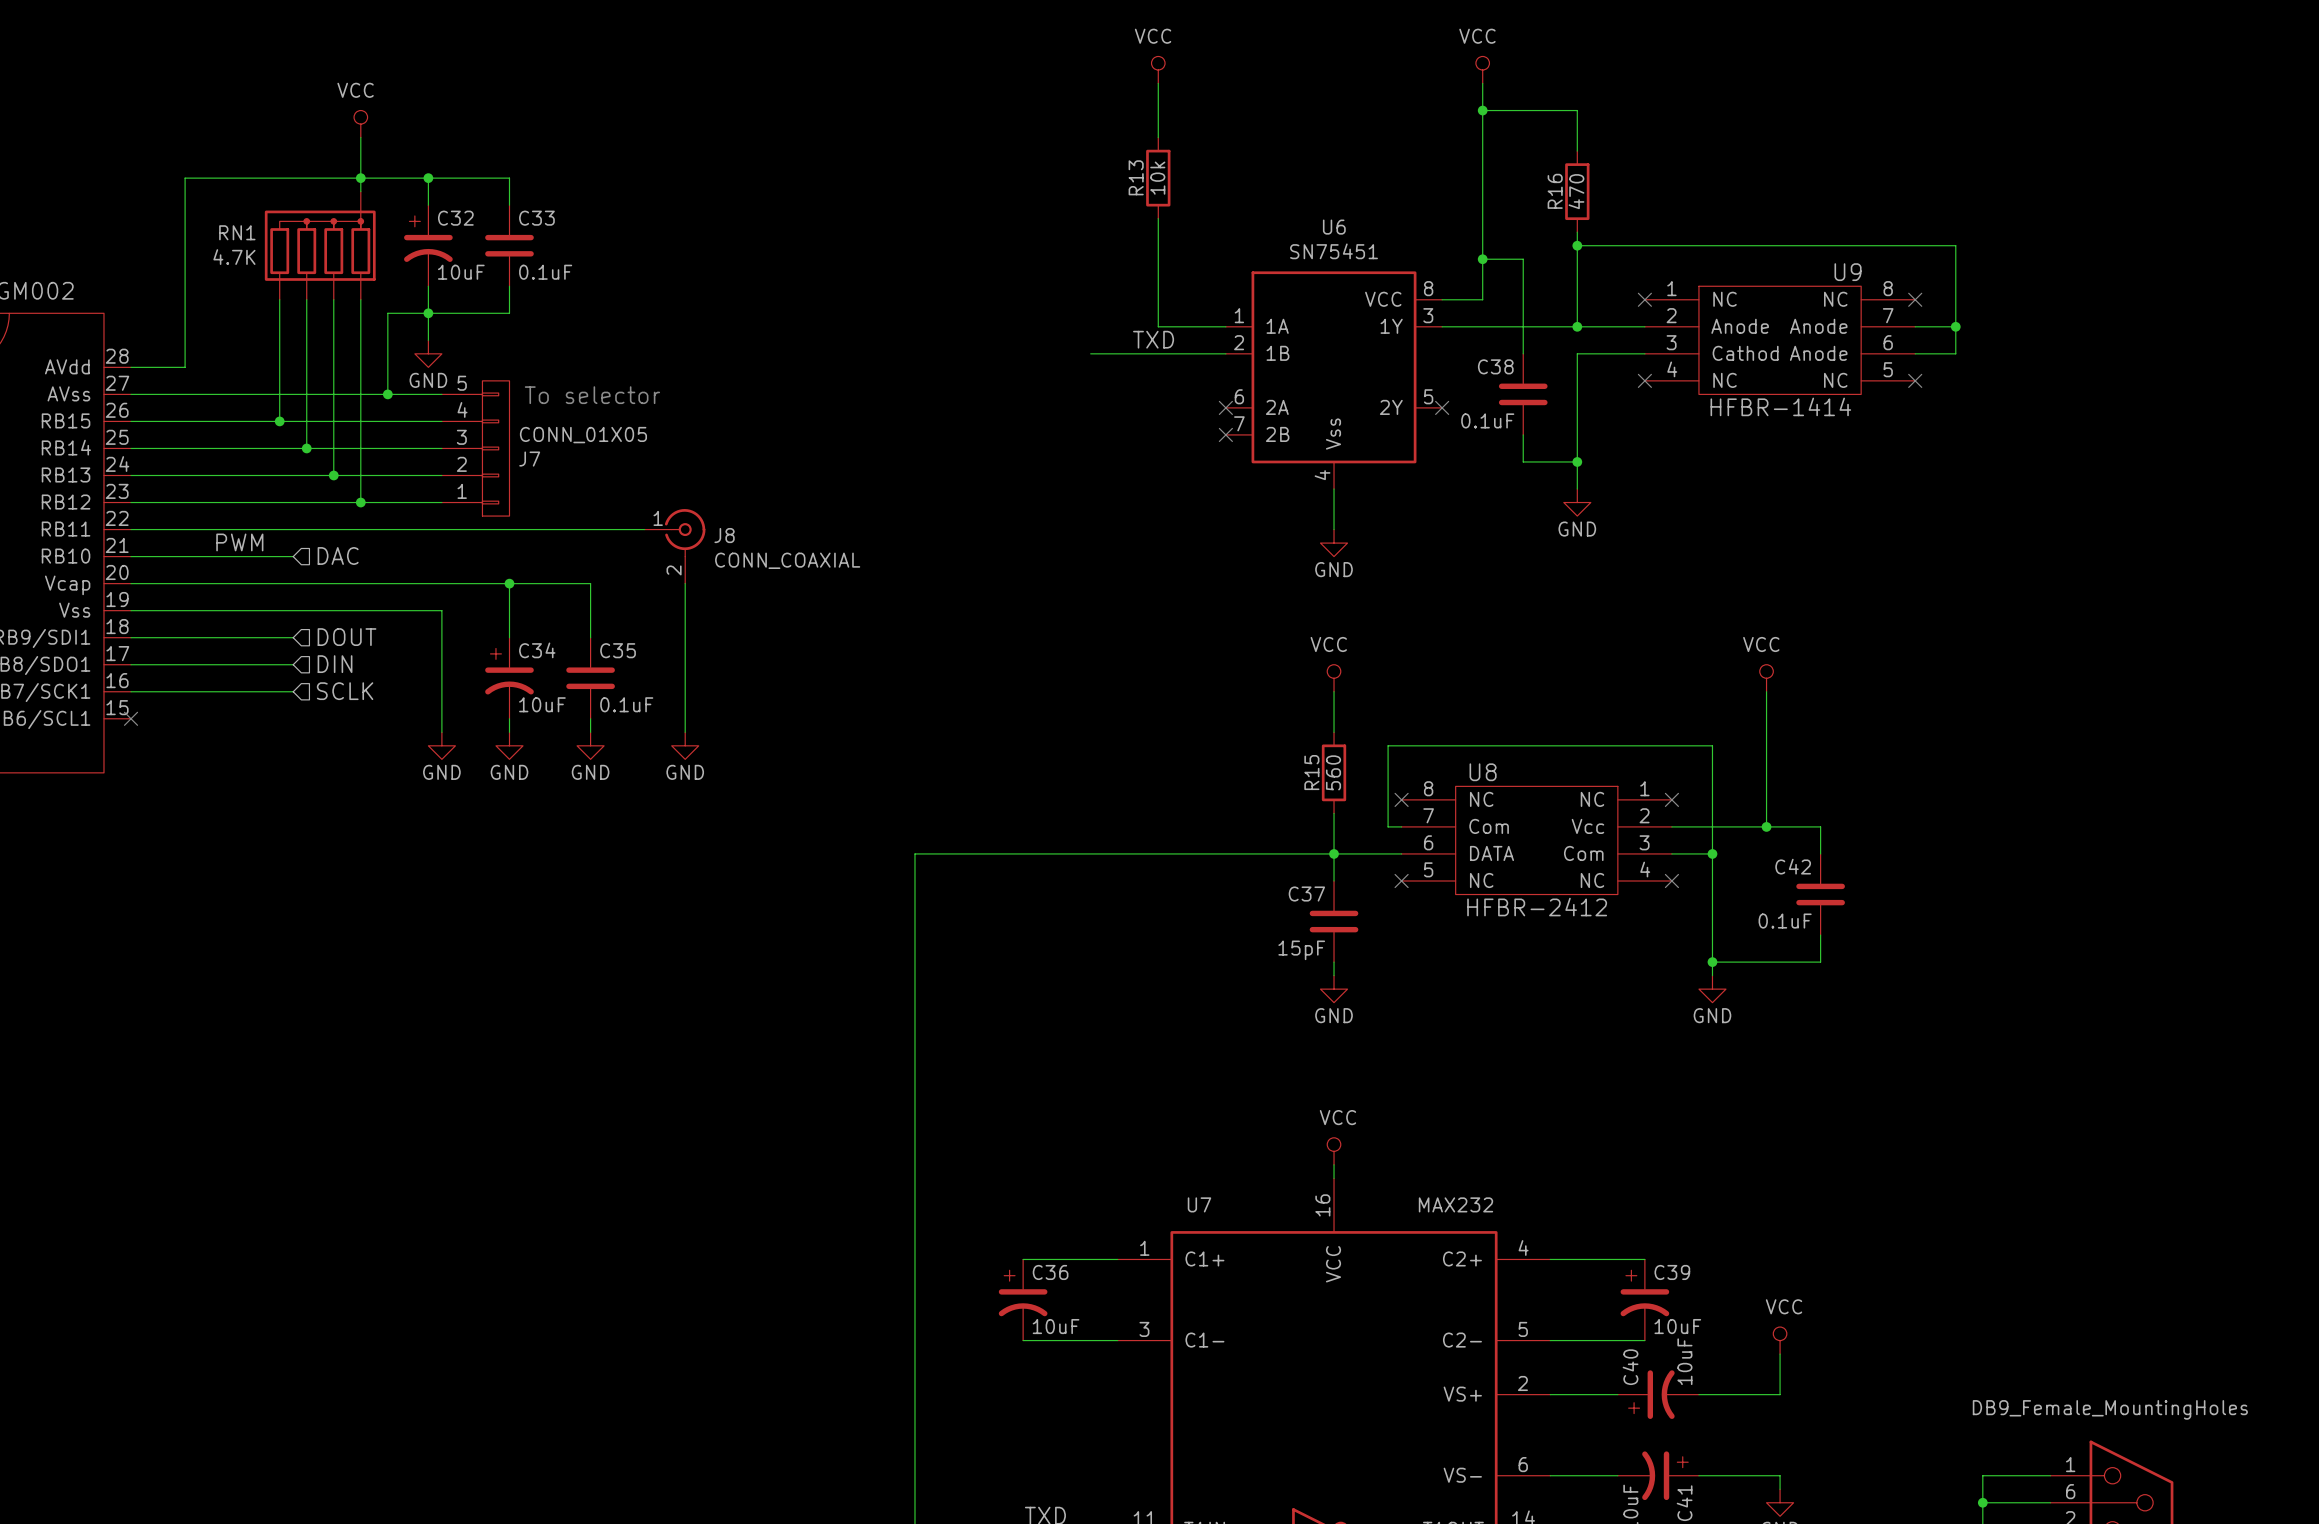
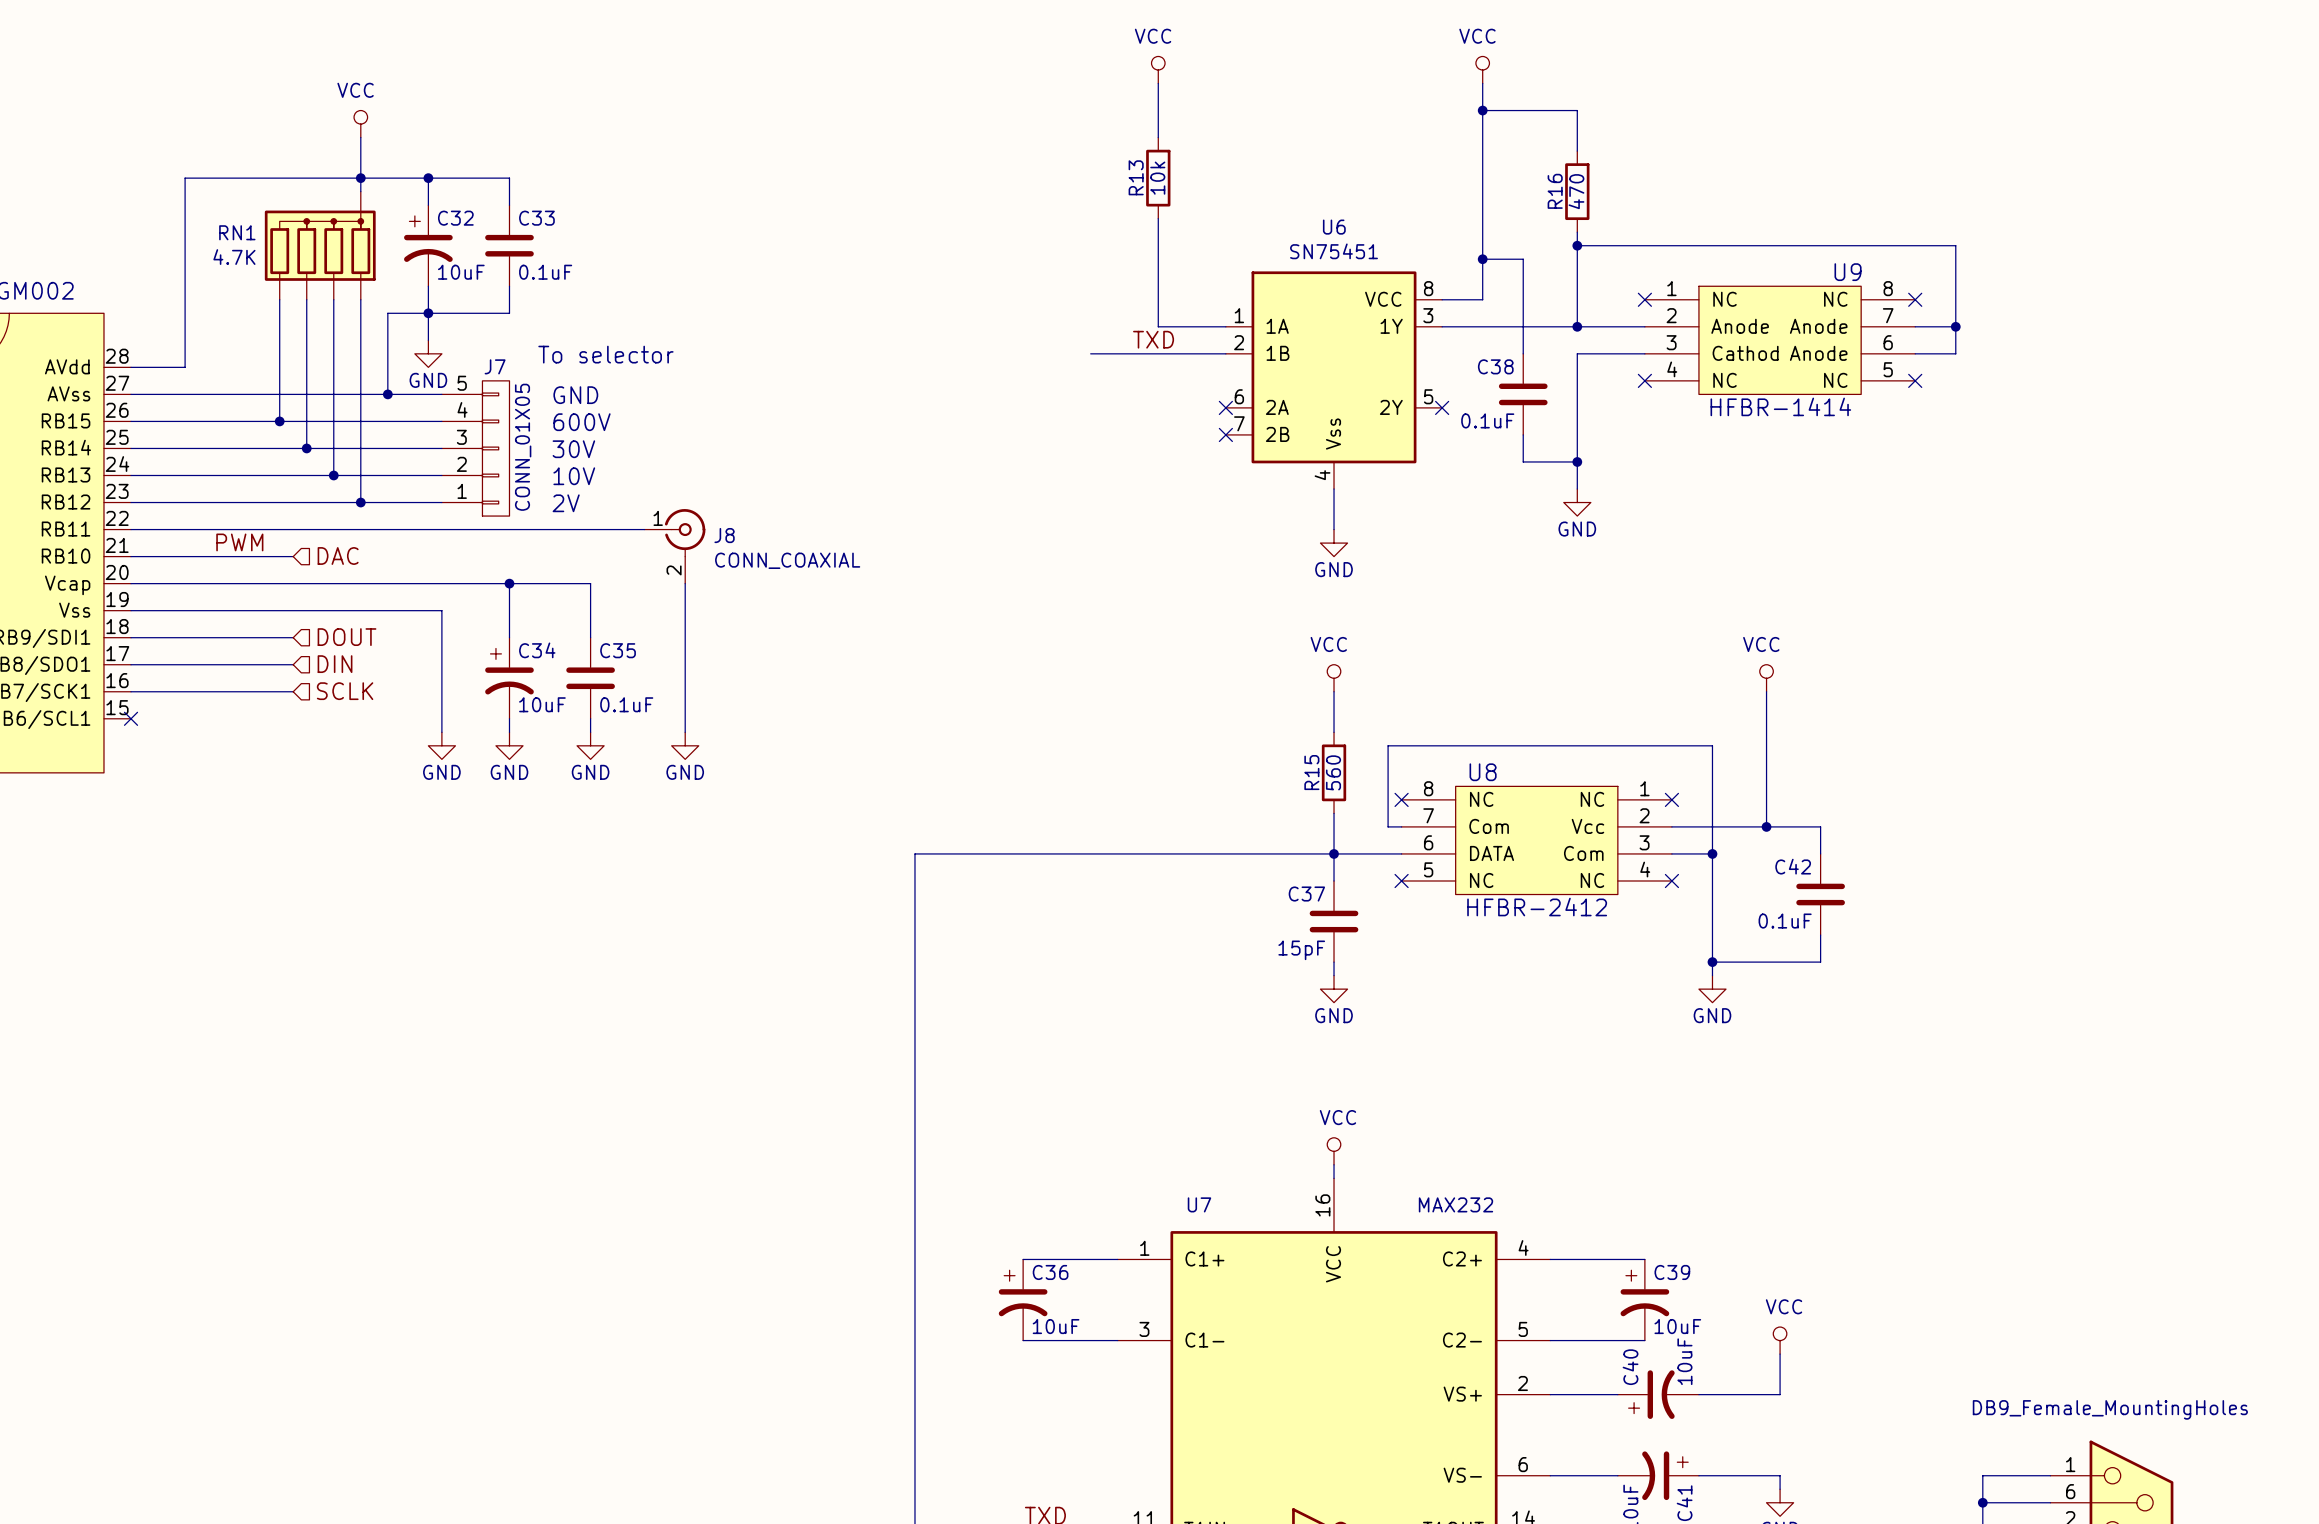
text: none -> GND (575, 395)
text position: To selector (592, 395) -> To selector (605, 354)
text: none -> 600V (582, 422)
J7 value rotation: 0° (583, 435) -> 90° counterclockwise (523, 447)
text: none -> 30V (573, 449)
J7 name position: J7 (529, 459) -> J7 (495, 366)
text: none -> 10V (574, 476)
text: none -> 2V (566, 503)

